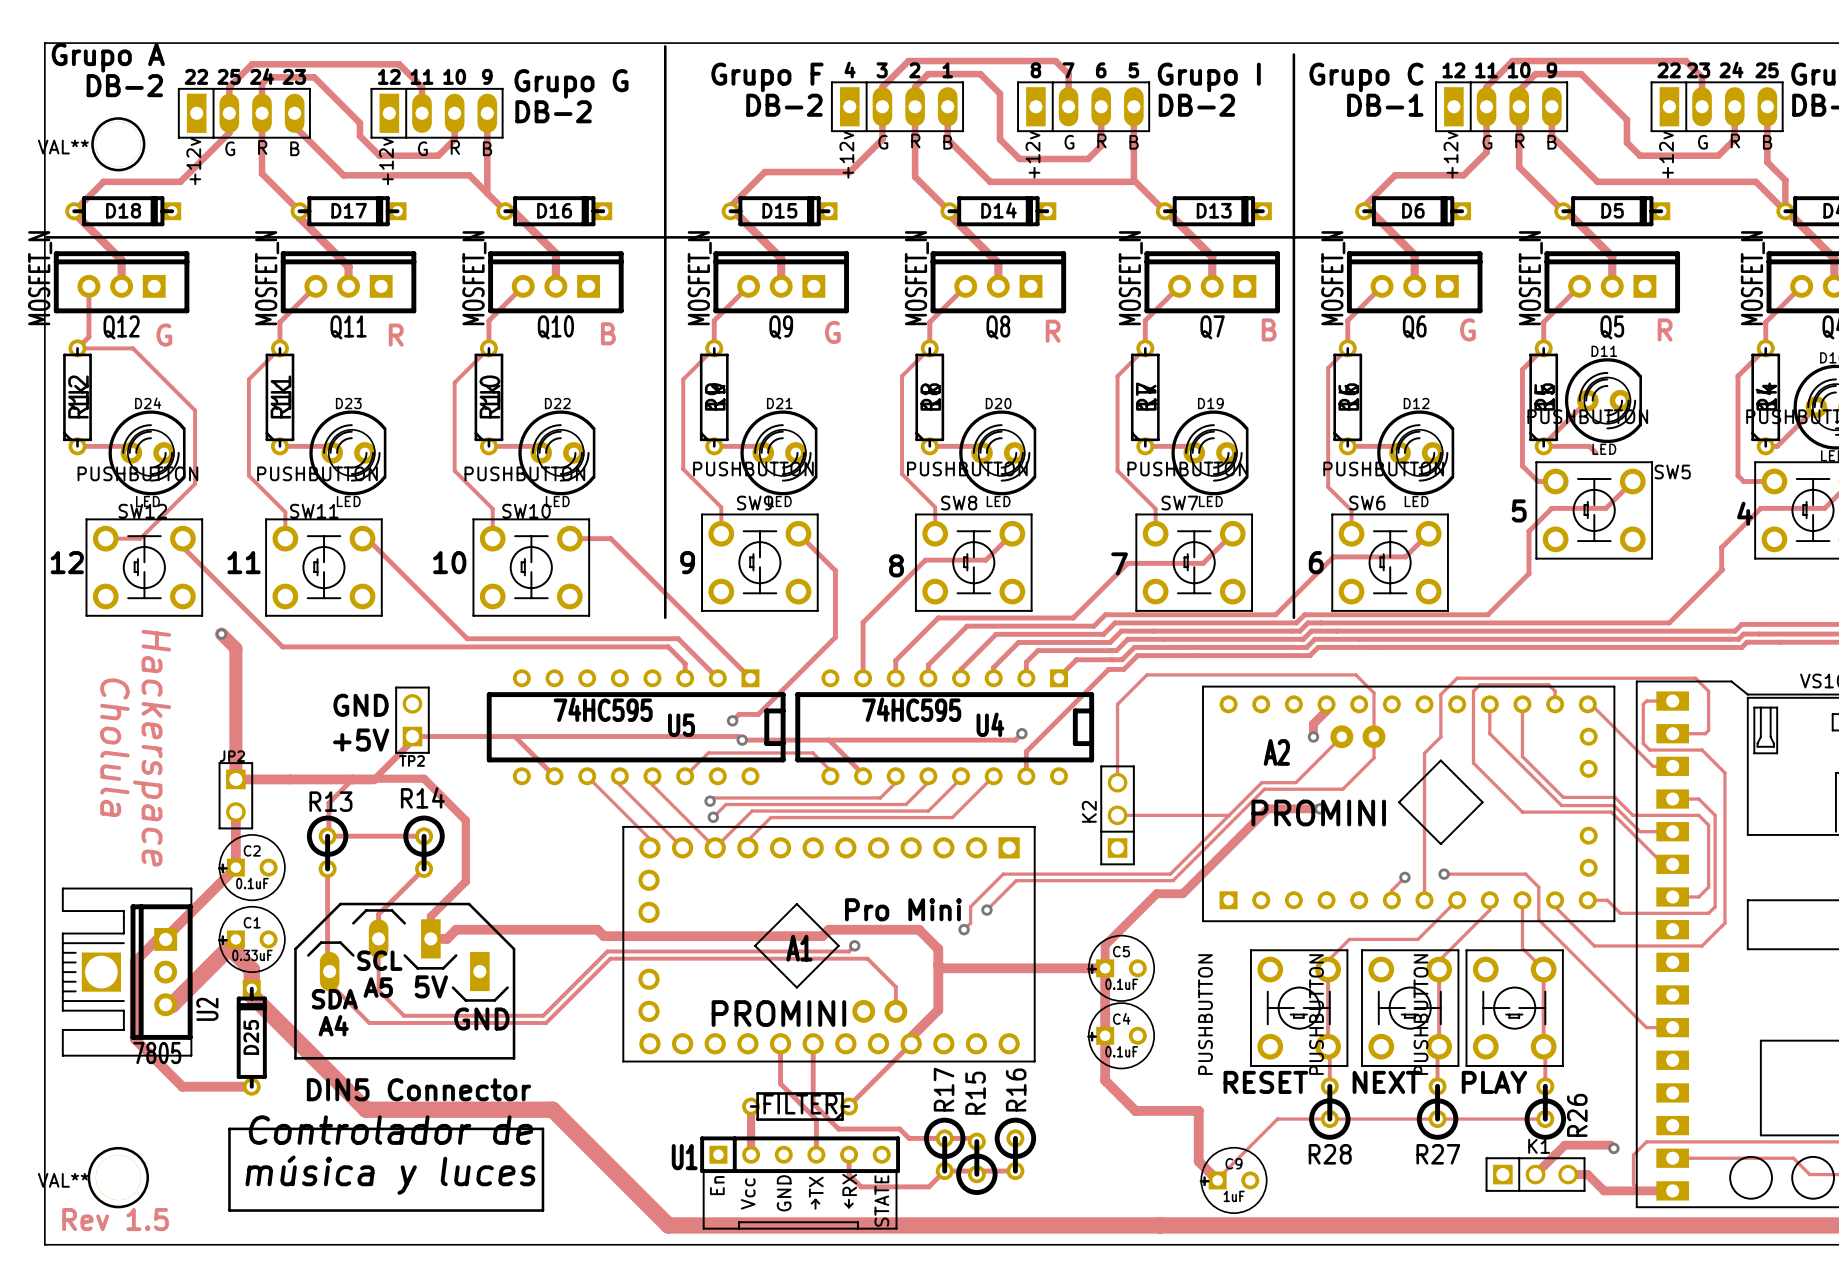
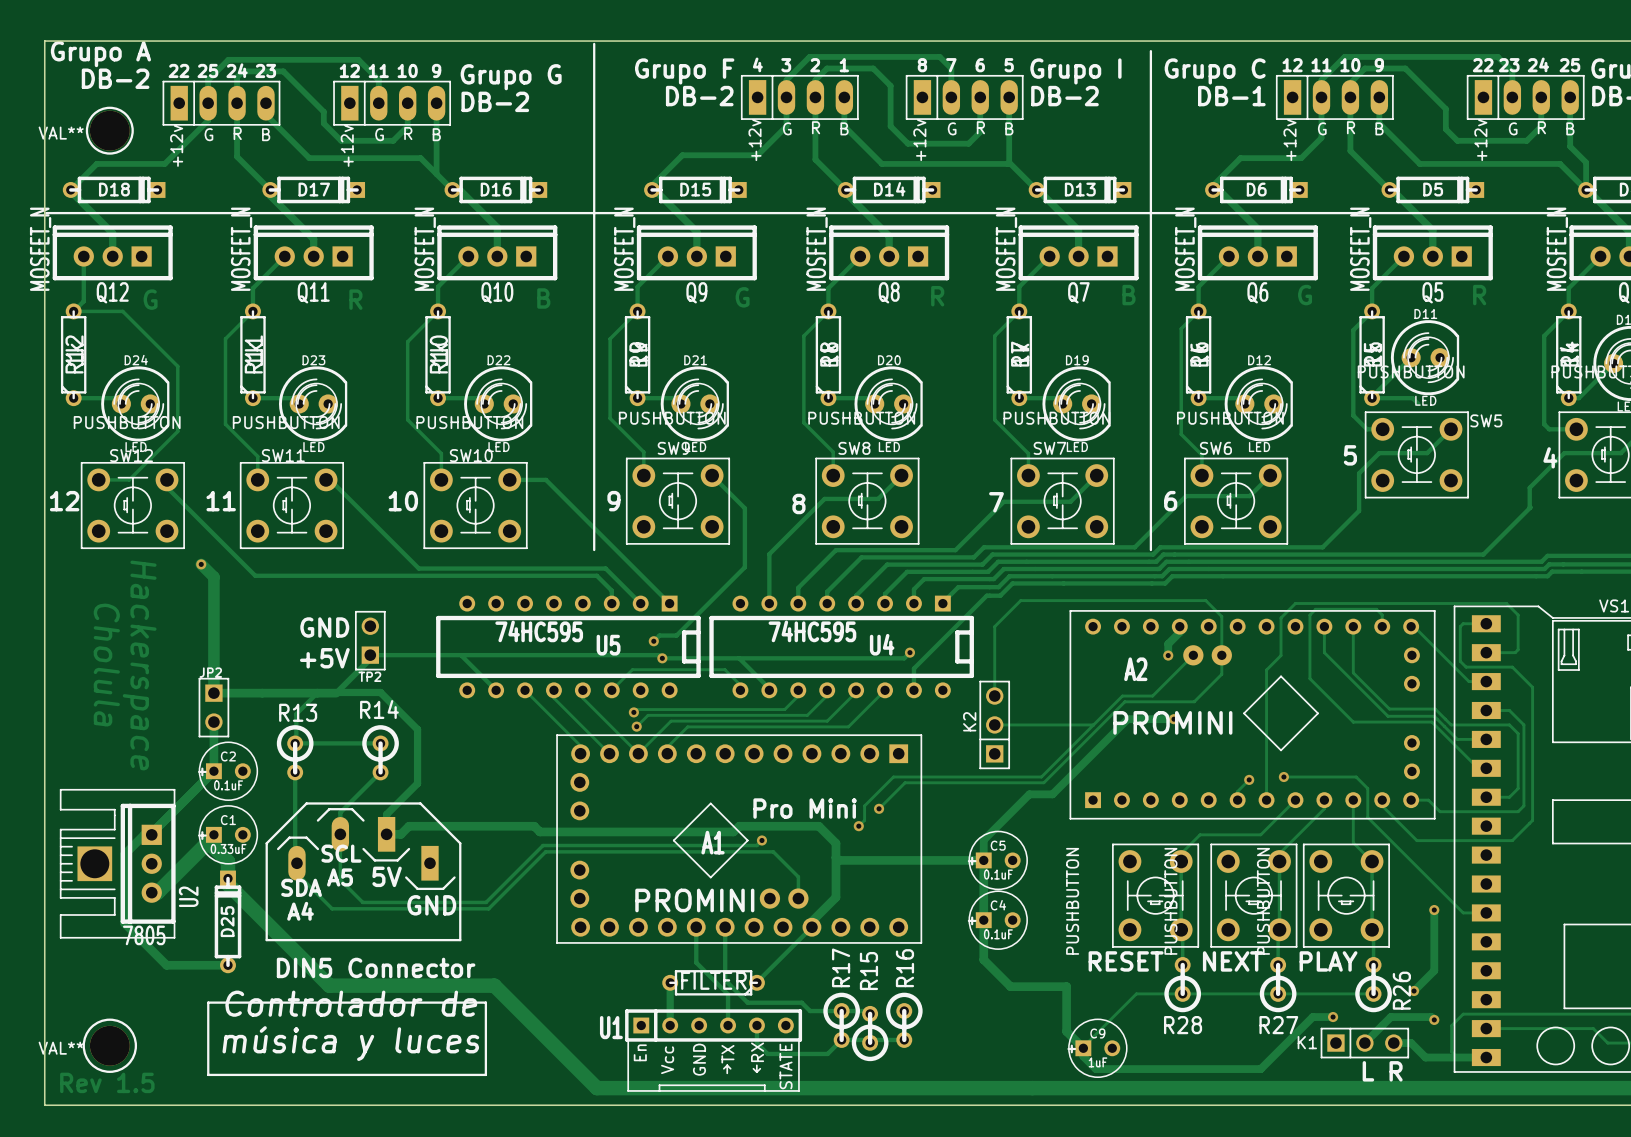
track: none -> (1434, 910) (1434, 970) (1414, 991)
via: none -> (1434, 910)
via: none -> (1414, 991)
track: none -> (1333, 1017) (1312, 1017) (1260, 1069) (1095, 1069) (1083, 1056) (1083, 1048)
via: none -> (1333, 1017)
K1 name position: K1 (1539, 1146) -> K1 (1307, 1042)
text: none -> L R (1382, 1071)

